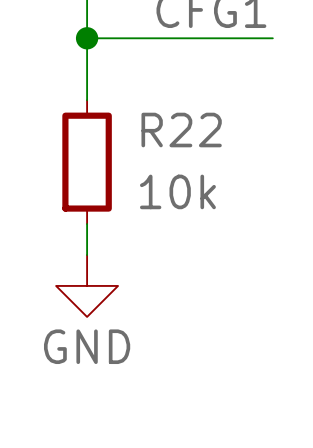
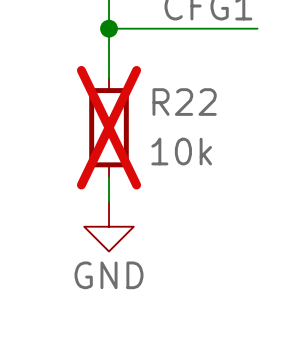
R22 do-not-place cross: none -> (109, 127)

